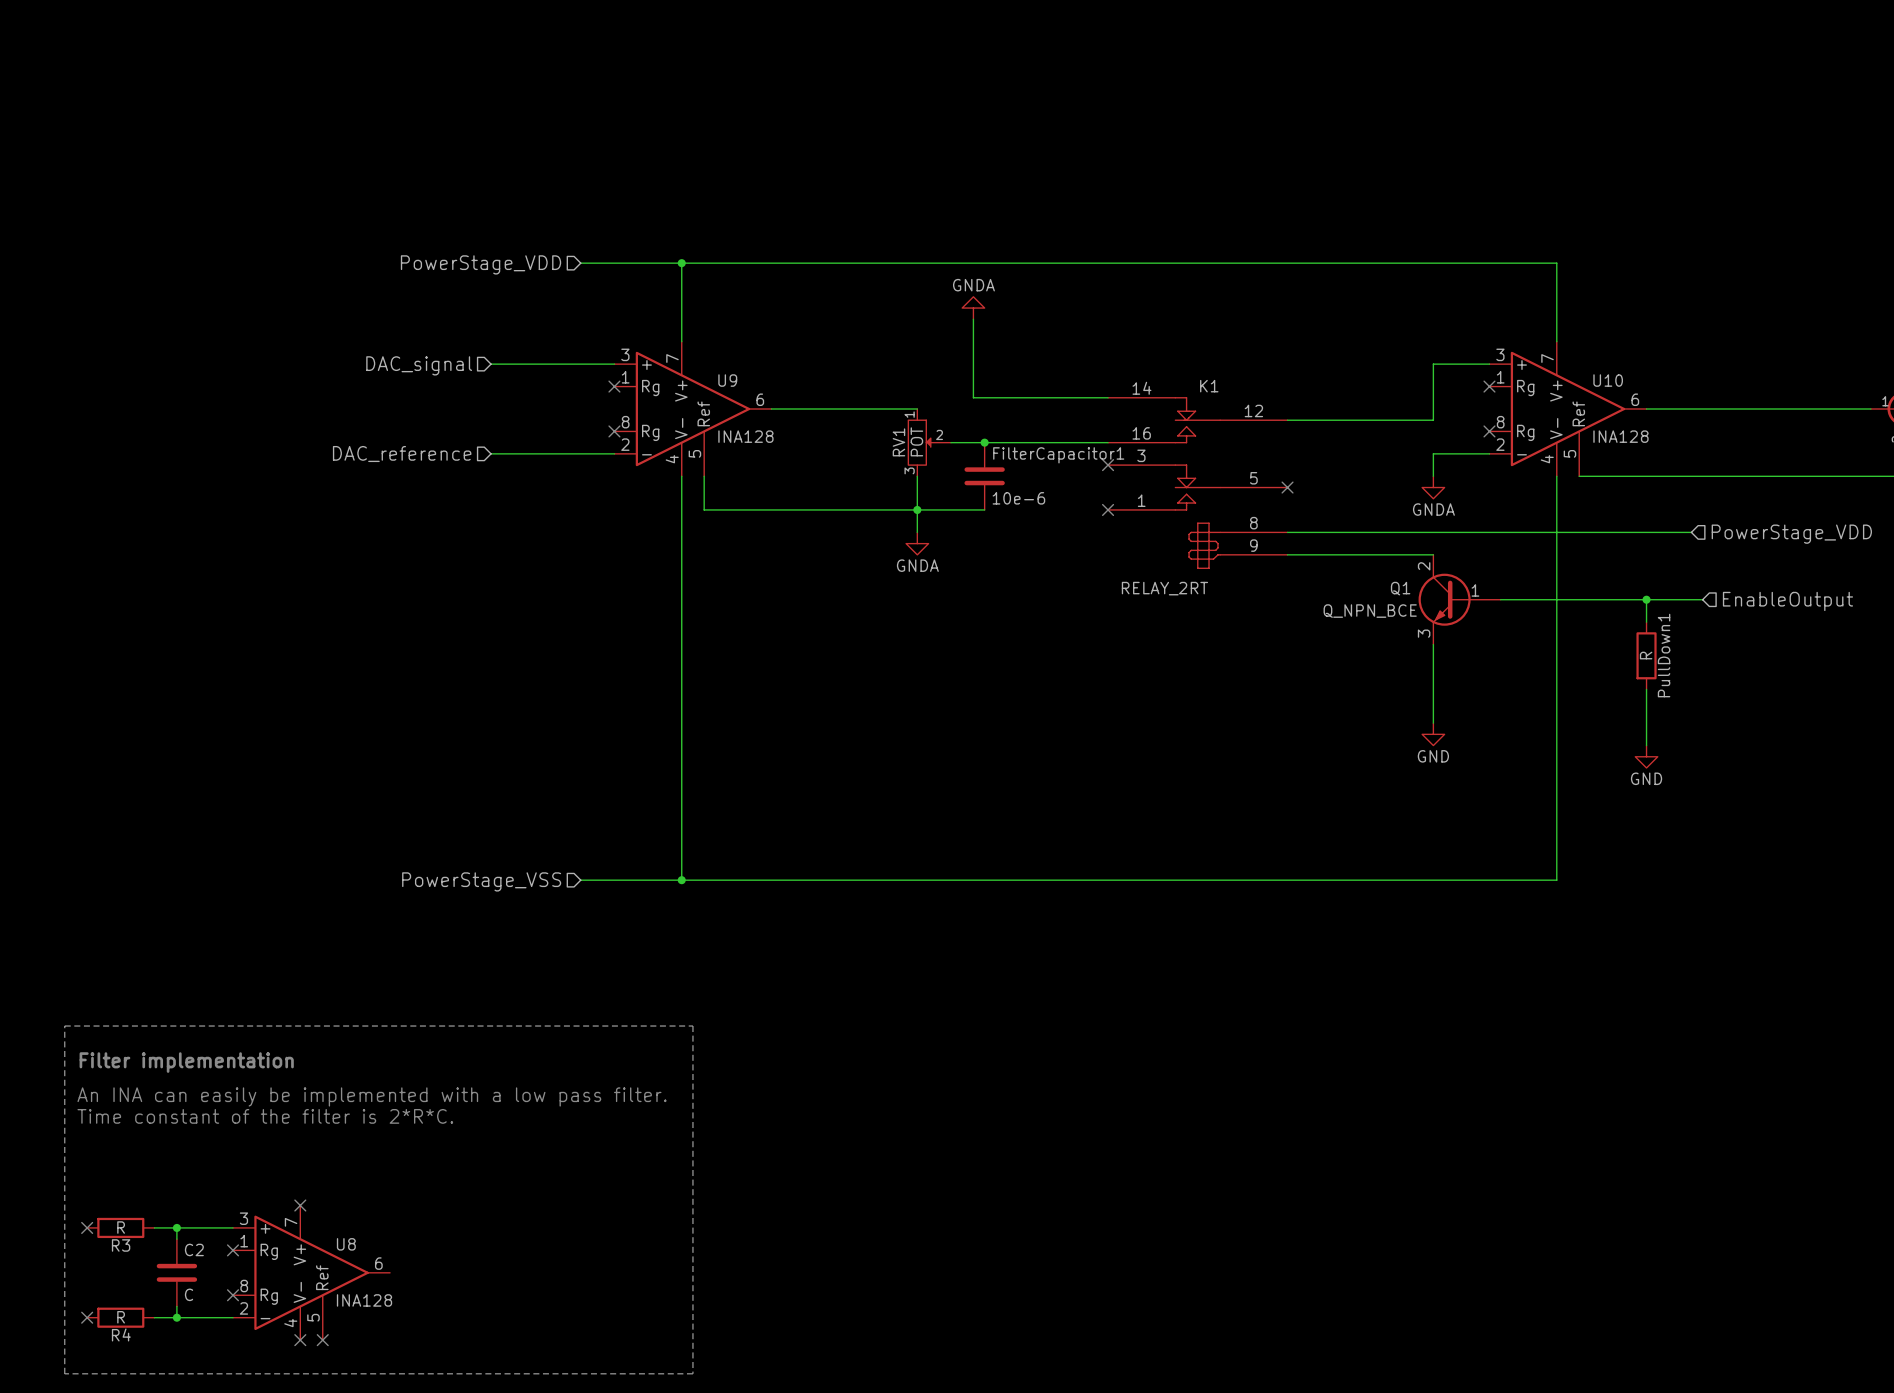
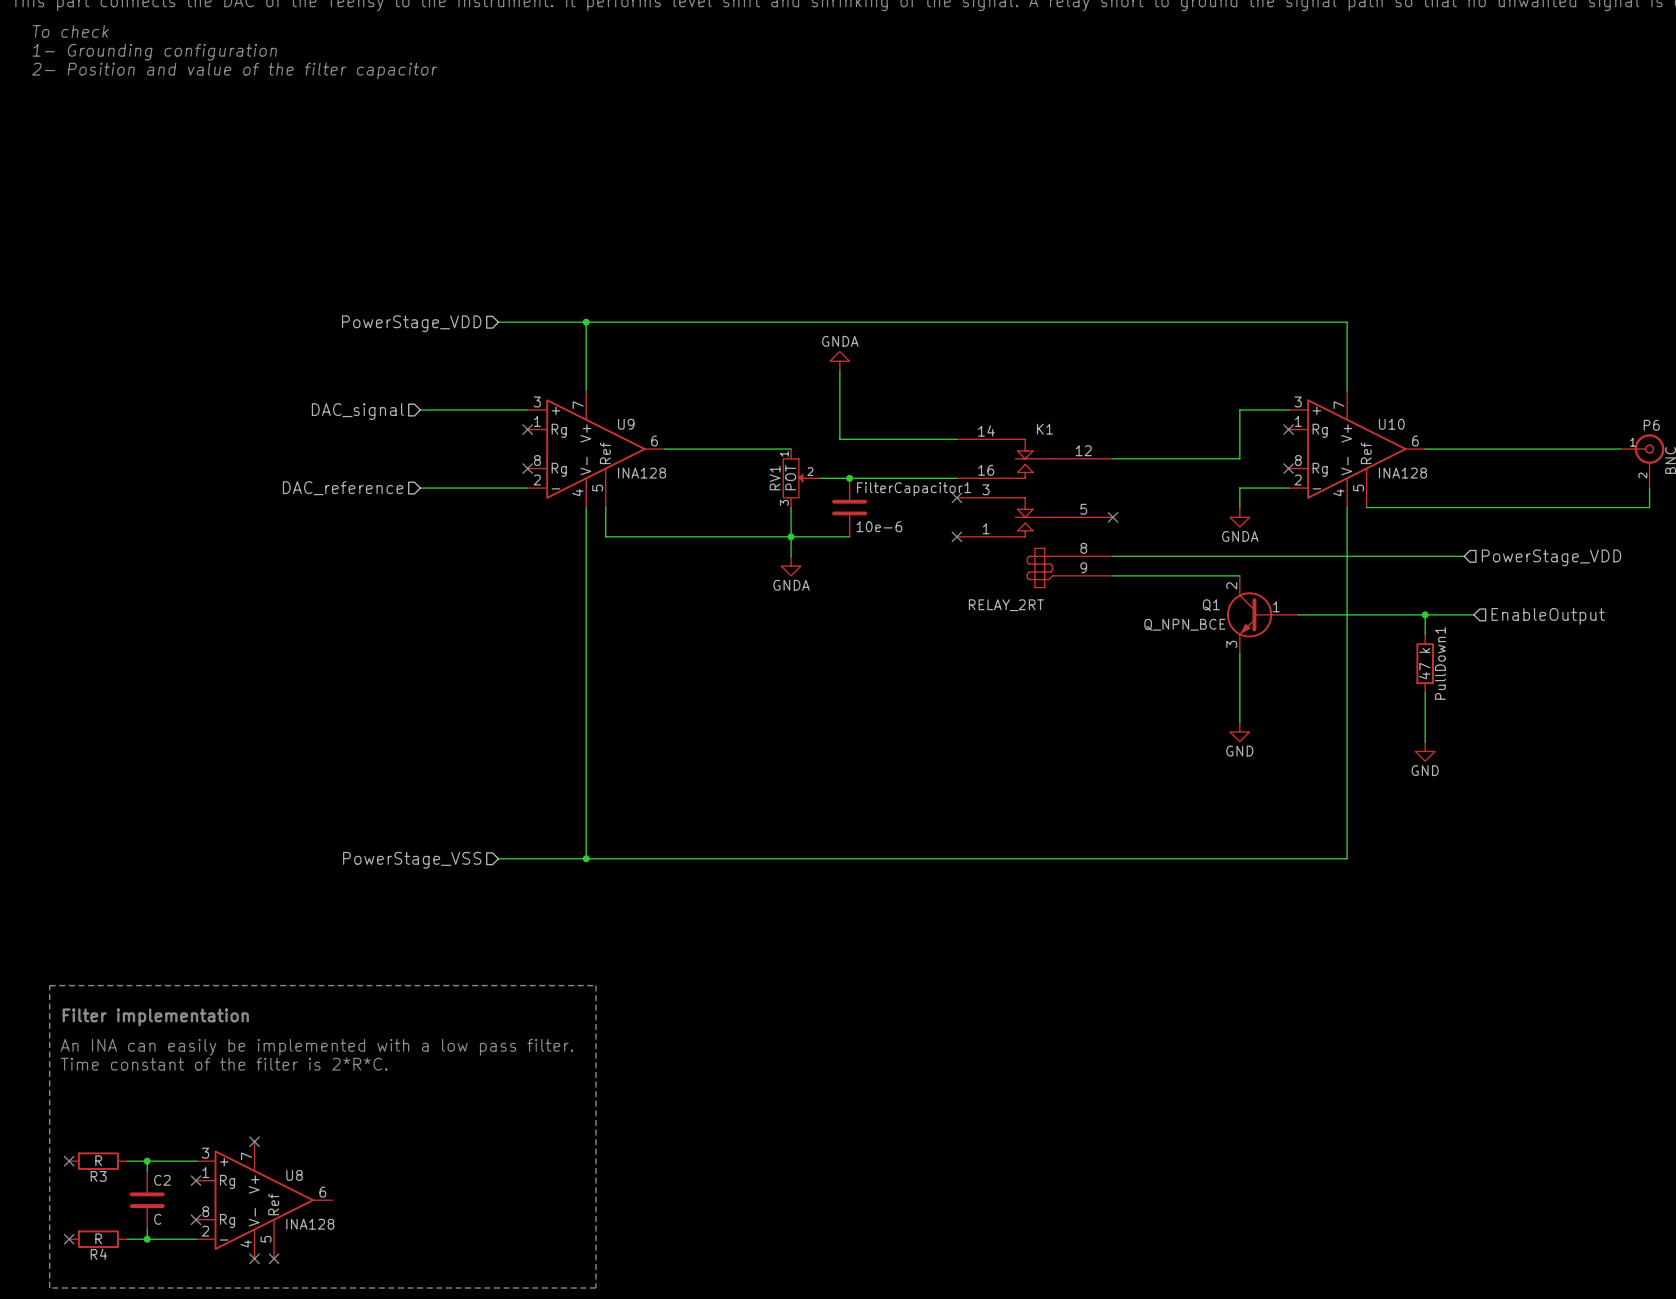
PullDown1 value: R (1646, 655) -> 47 k (1424, 663)

